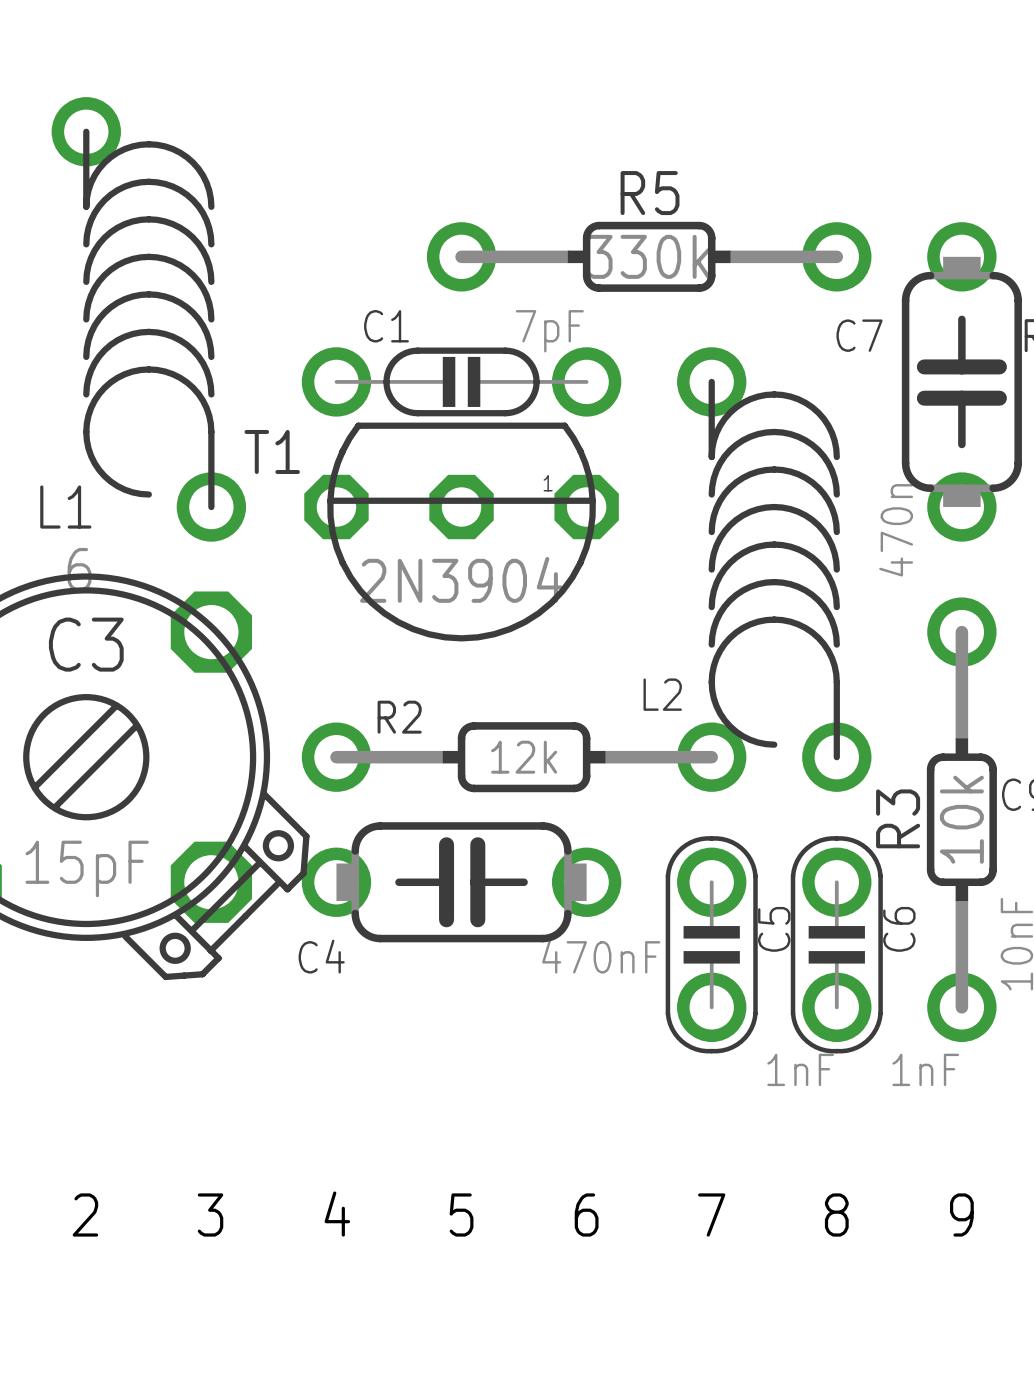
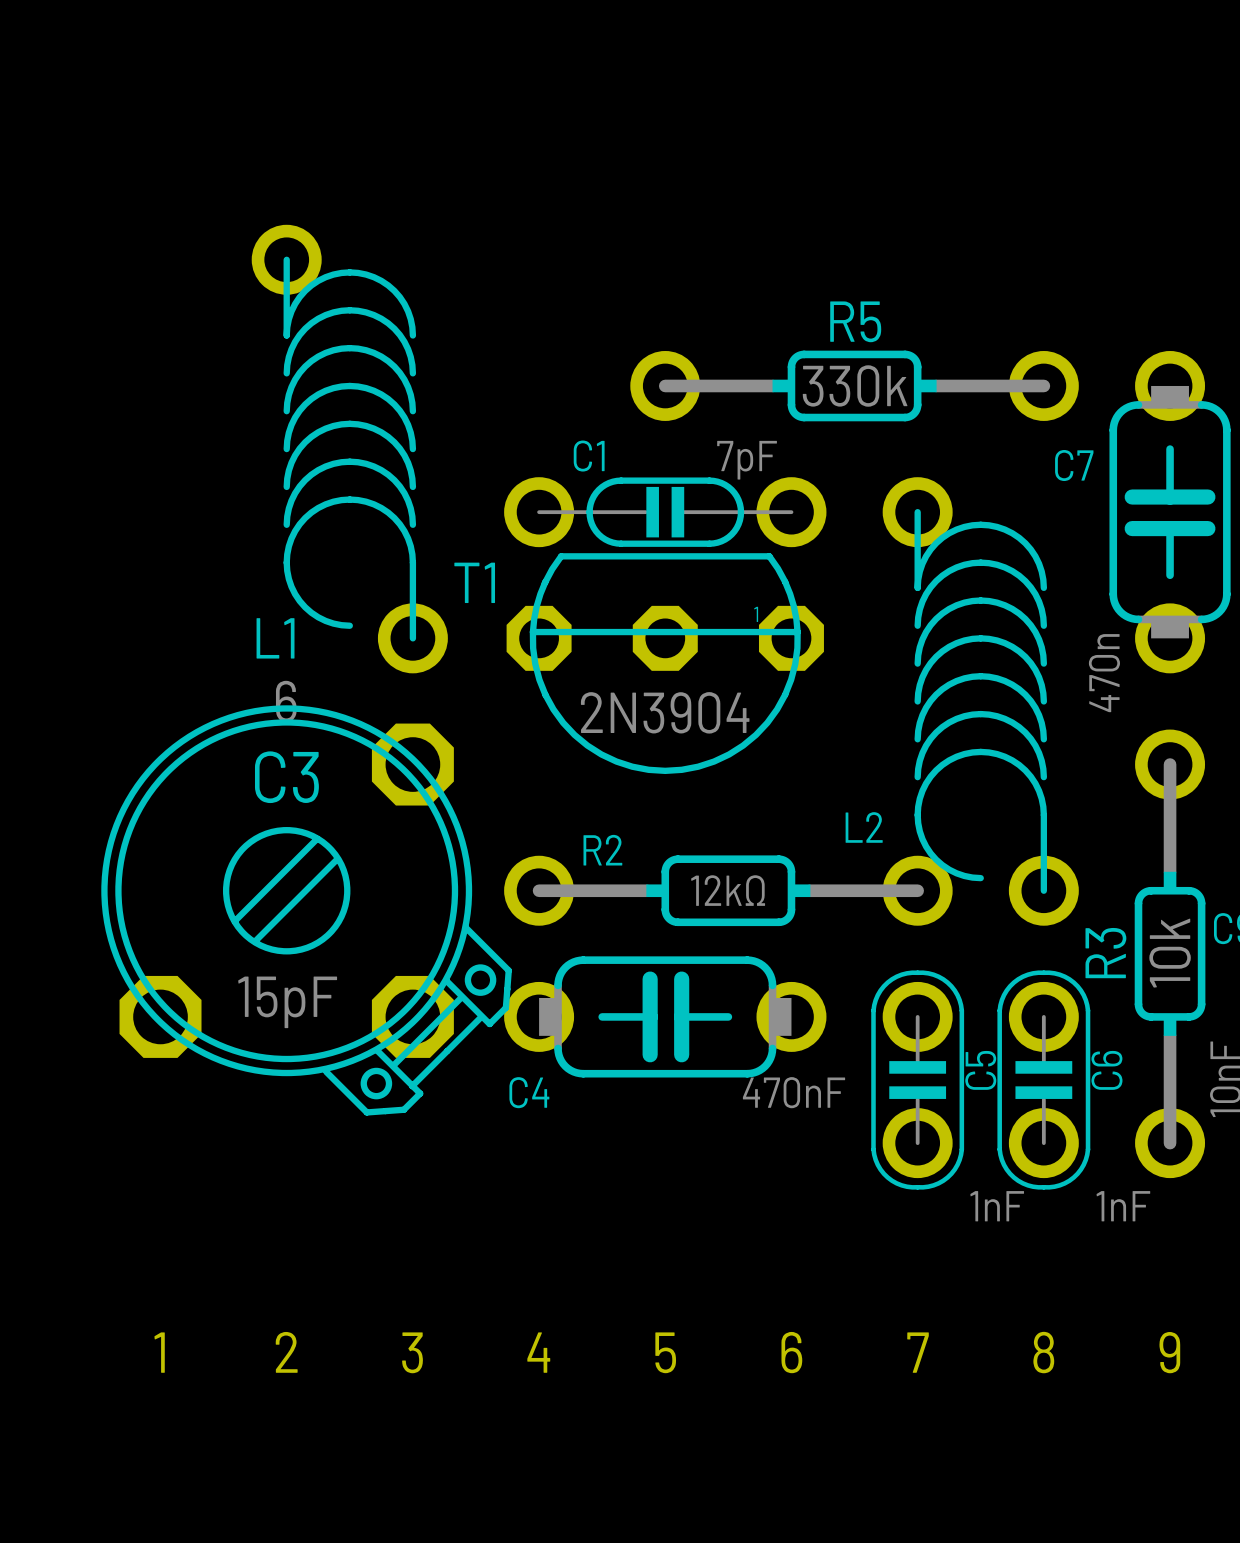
R2 value: 12k (524, 757) -> 12kΩ (728, 890)

